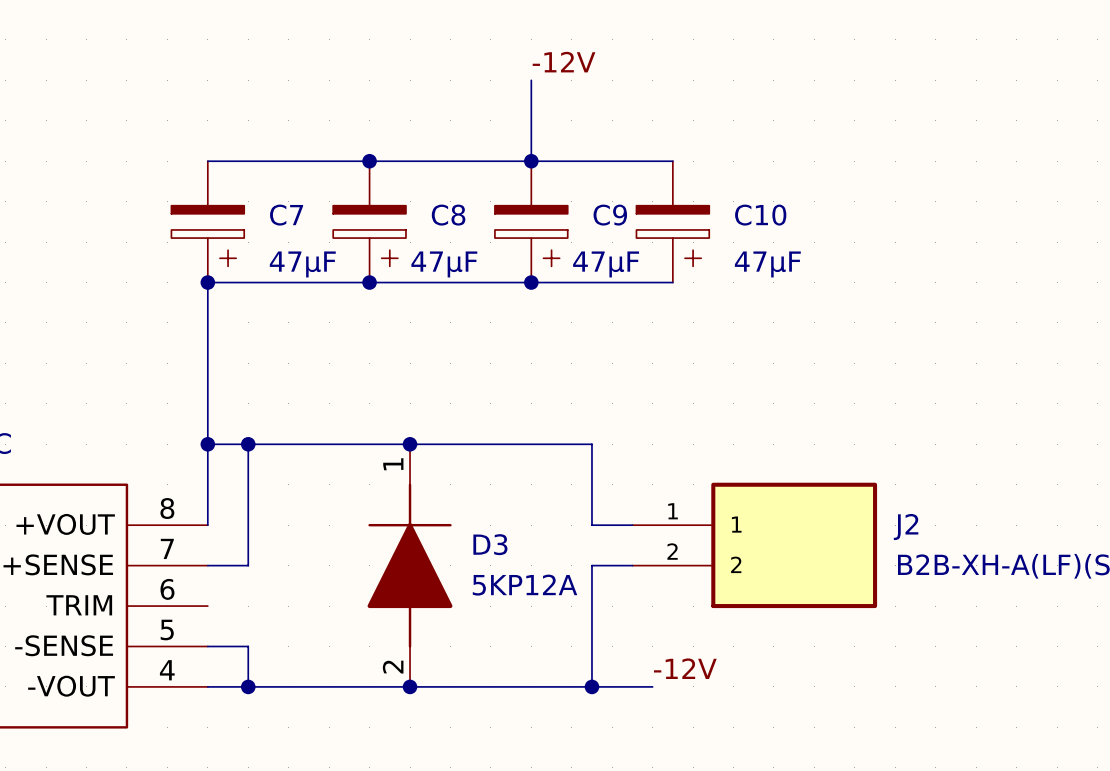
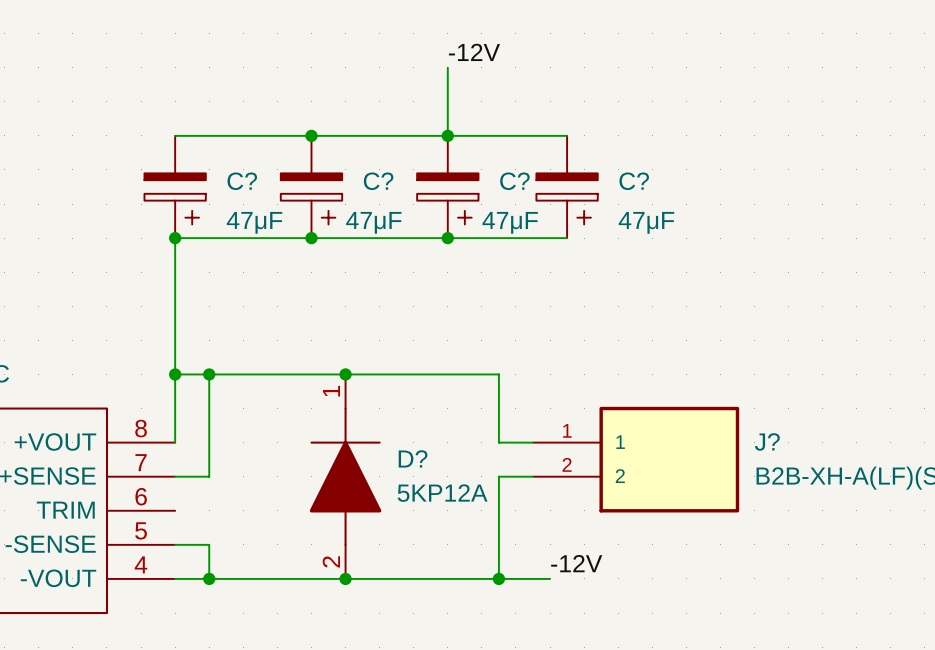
C7 name: C7 (286, 215) -> C? (242, 181)
C8 name: C8 (448, 215) -> C? (378, 181)
C9 name: C9 (610, 215) -> C? (514, 181)
C10 name: C10 (760, 215) -> C? (634, 181)
J2 name: J2 (906, 527) -> J? (767, 441)
D3 name: D3 (490, 544) -> D? (413, 458)

